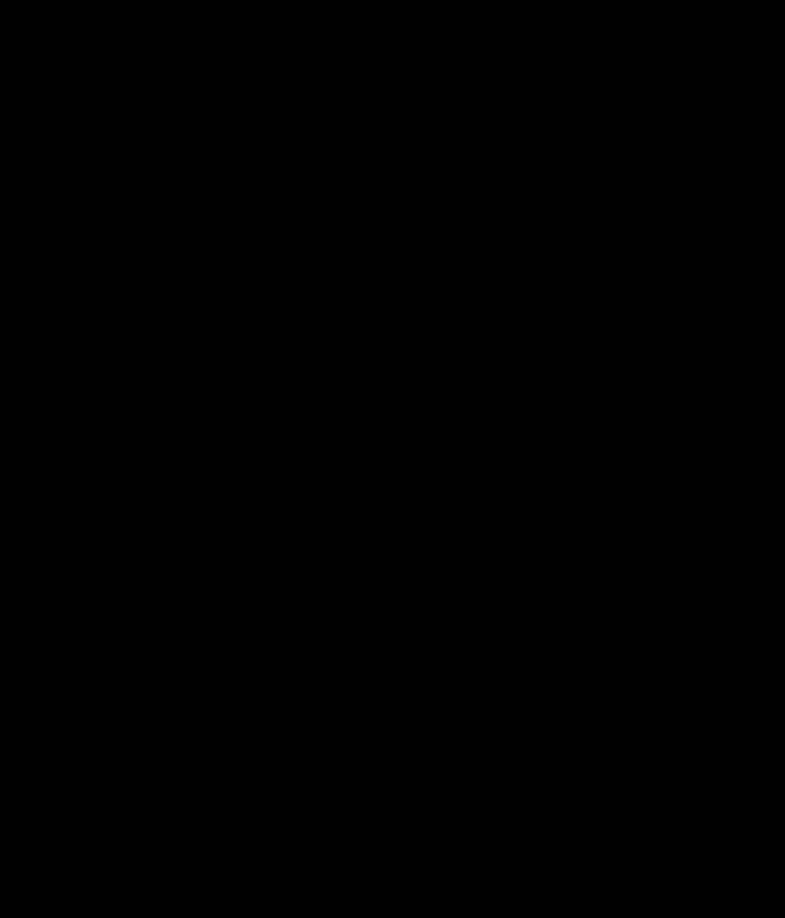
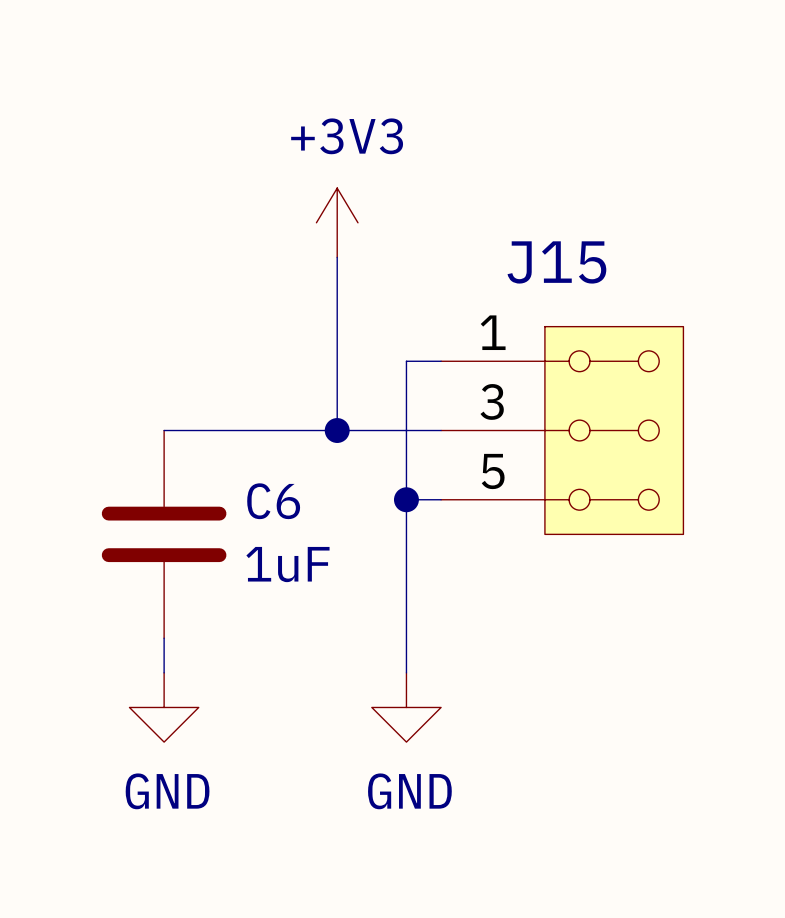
power symbol: none -> +3V3 (337, 222)
wire: none -> (337, 257) (337, 430)
wire: none -> (441, 361) (406, 361) (406, 672)
wire: none -> (164, 430) (441, 430)
junction: none -> (337, 430)
J15: none -> (562, 430)
wire: none -> (406, 499) (441, 499)
junction: none -> (406, 499)
C6: none -> 1uF (164, 534)
wire: none -> (164, 638) (164, 672)
power symbol: none -> GND (164, 707)
power symbol: none -> GND (406, 707)

